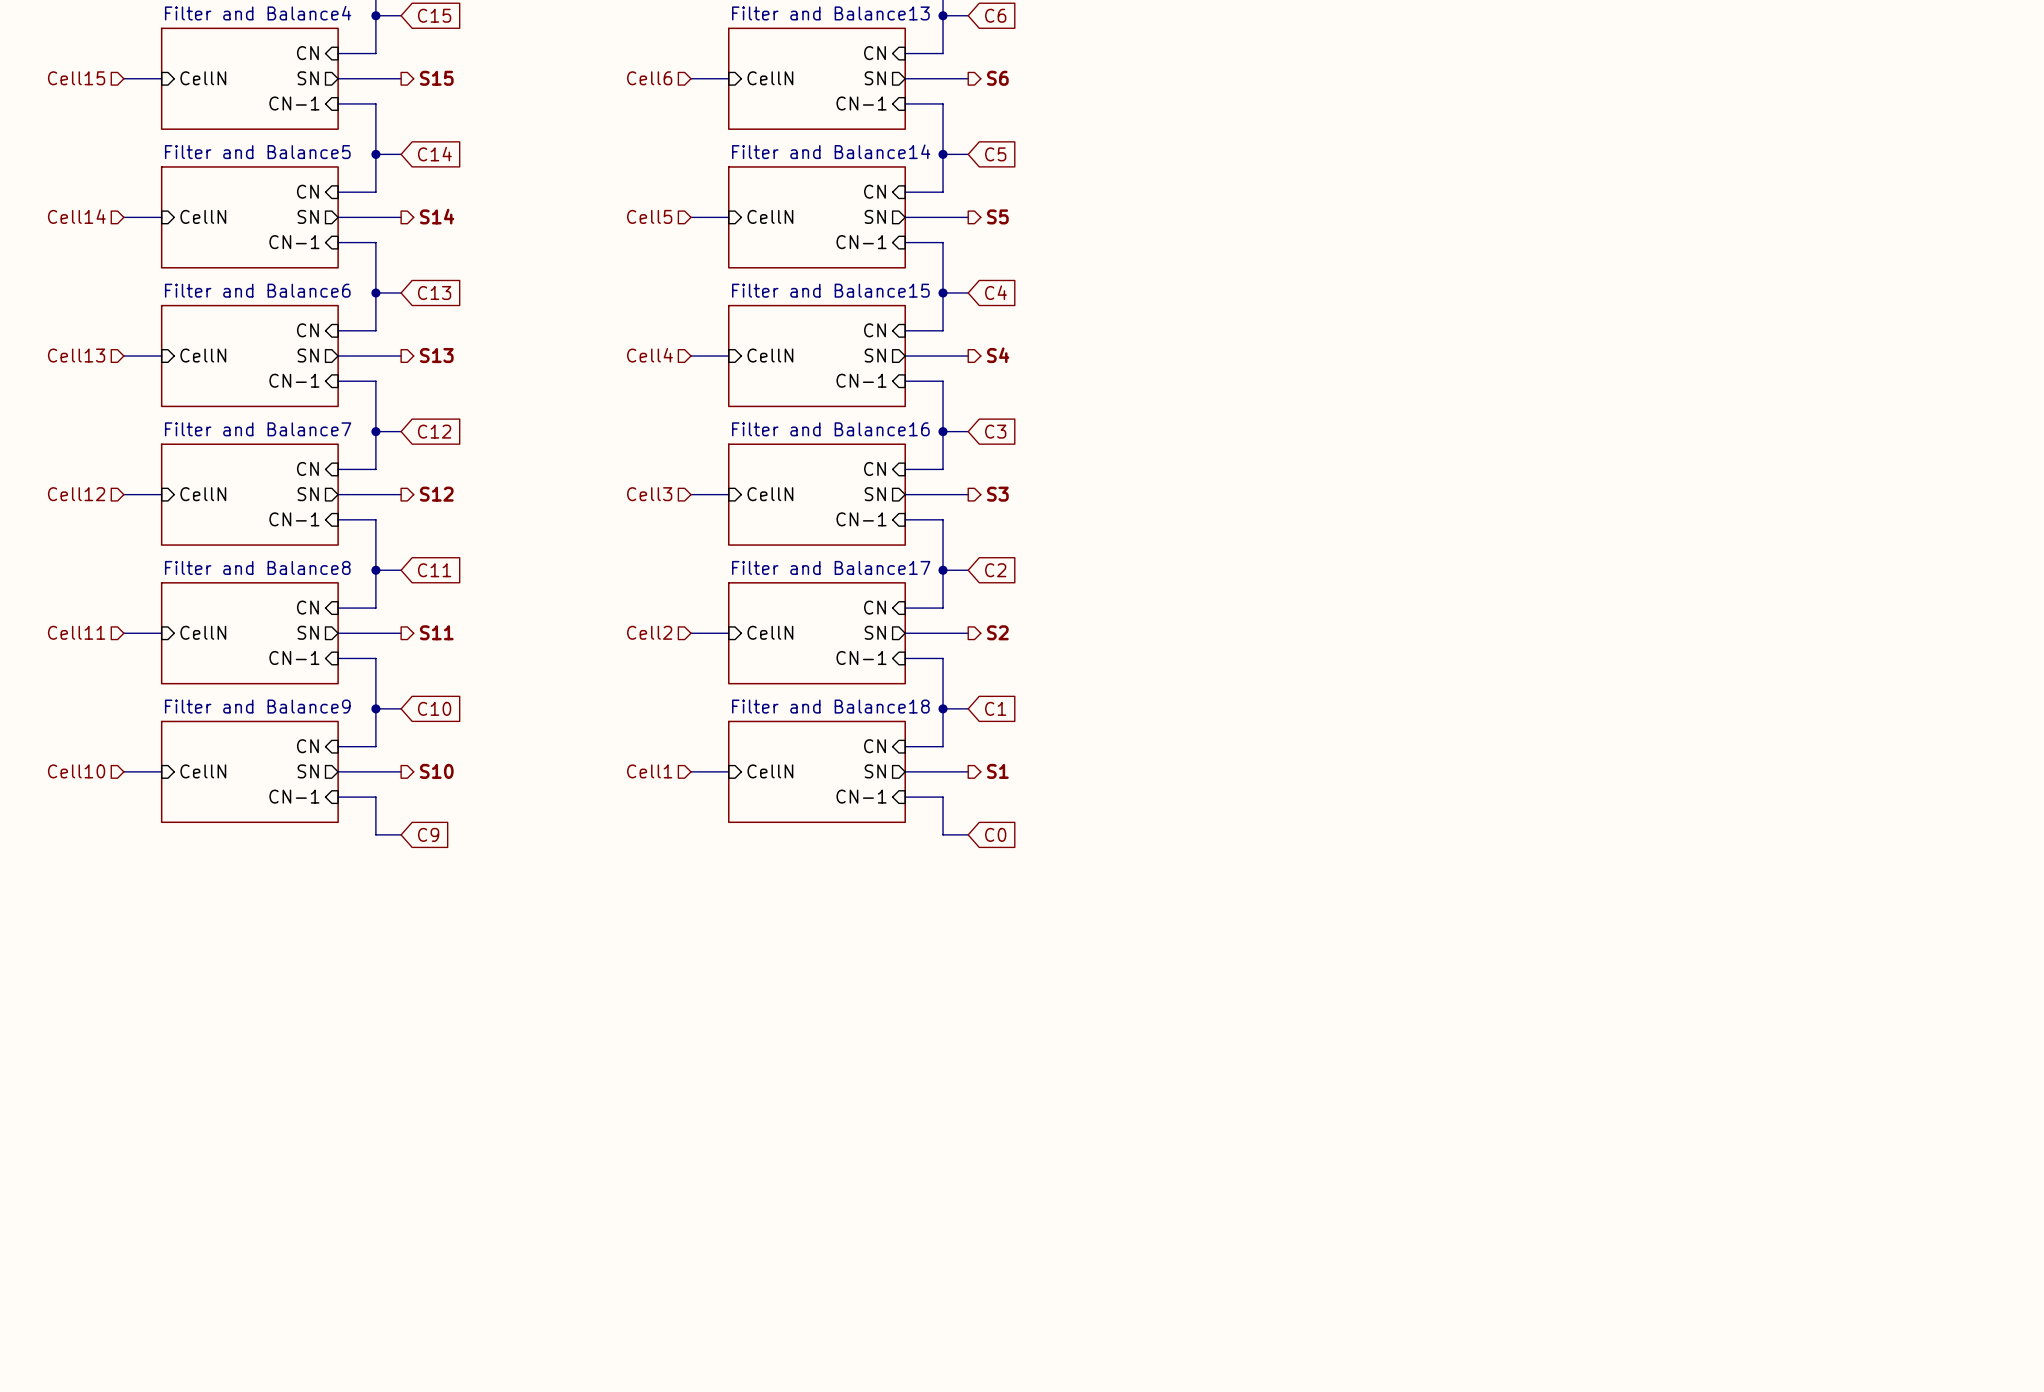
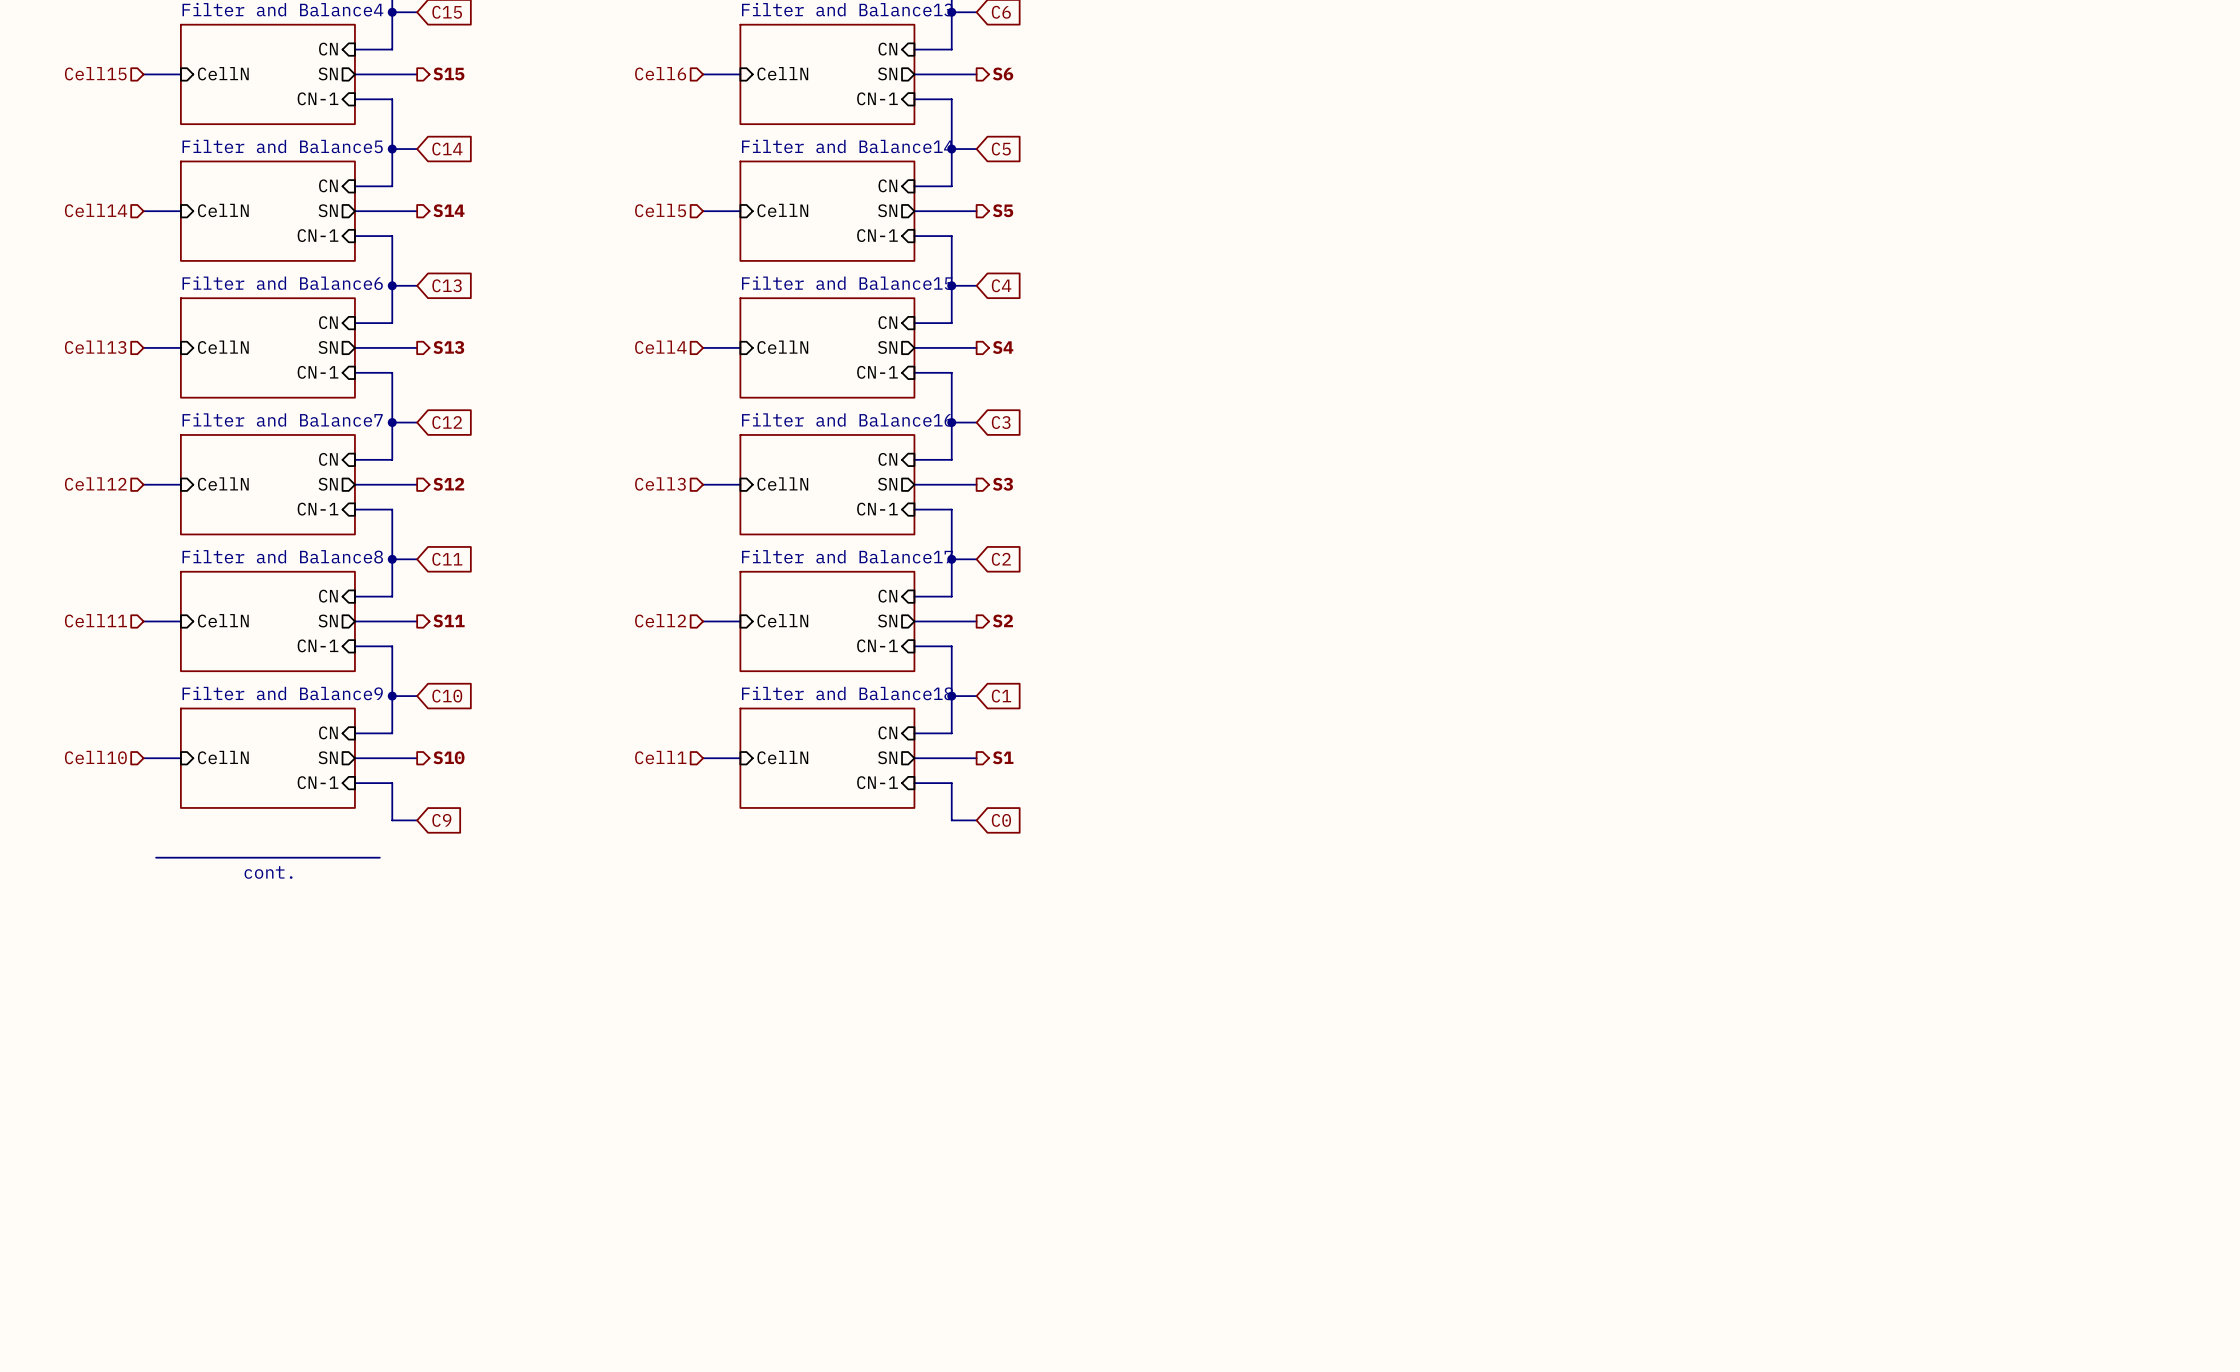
line: none -> (156, 857) (379, 857)
text: none -> cont. (268, 872)

